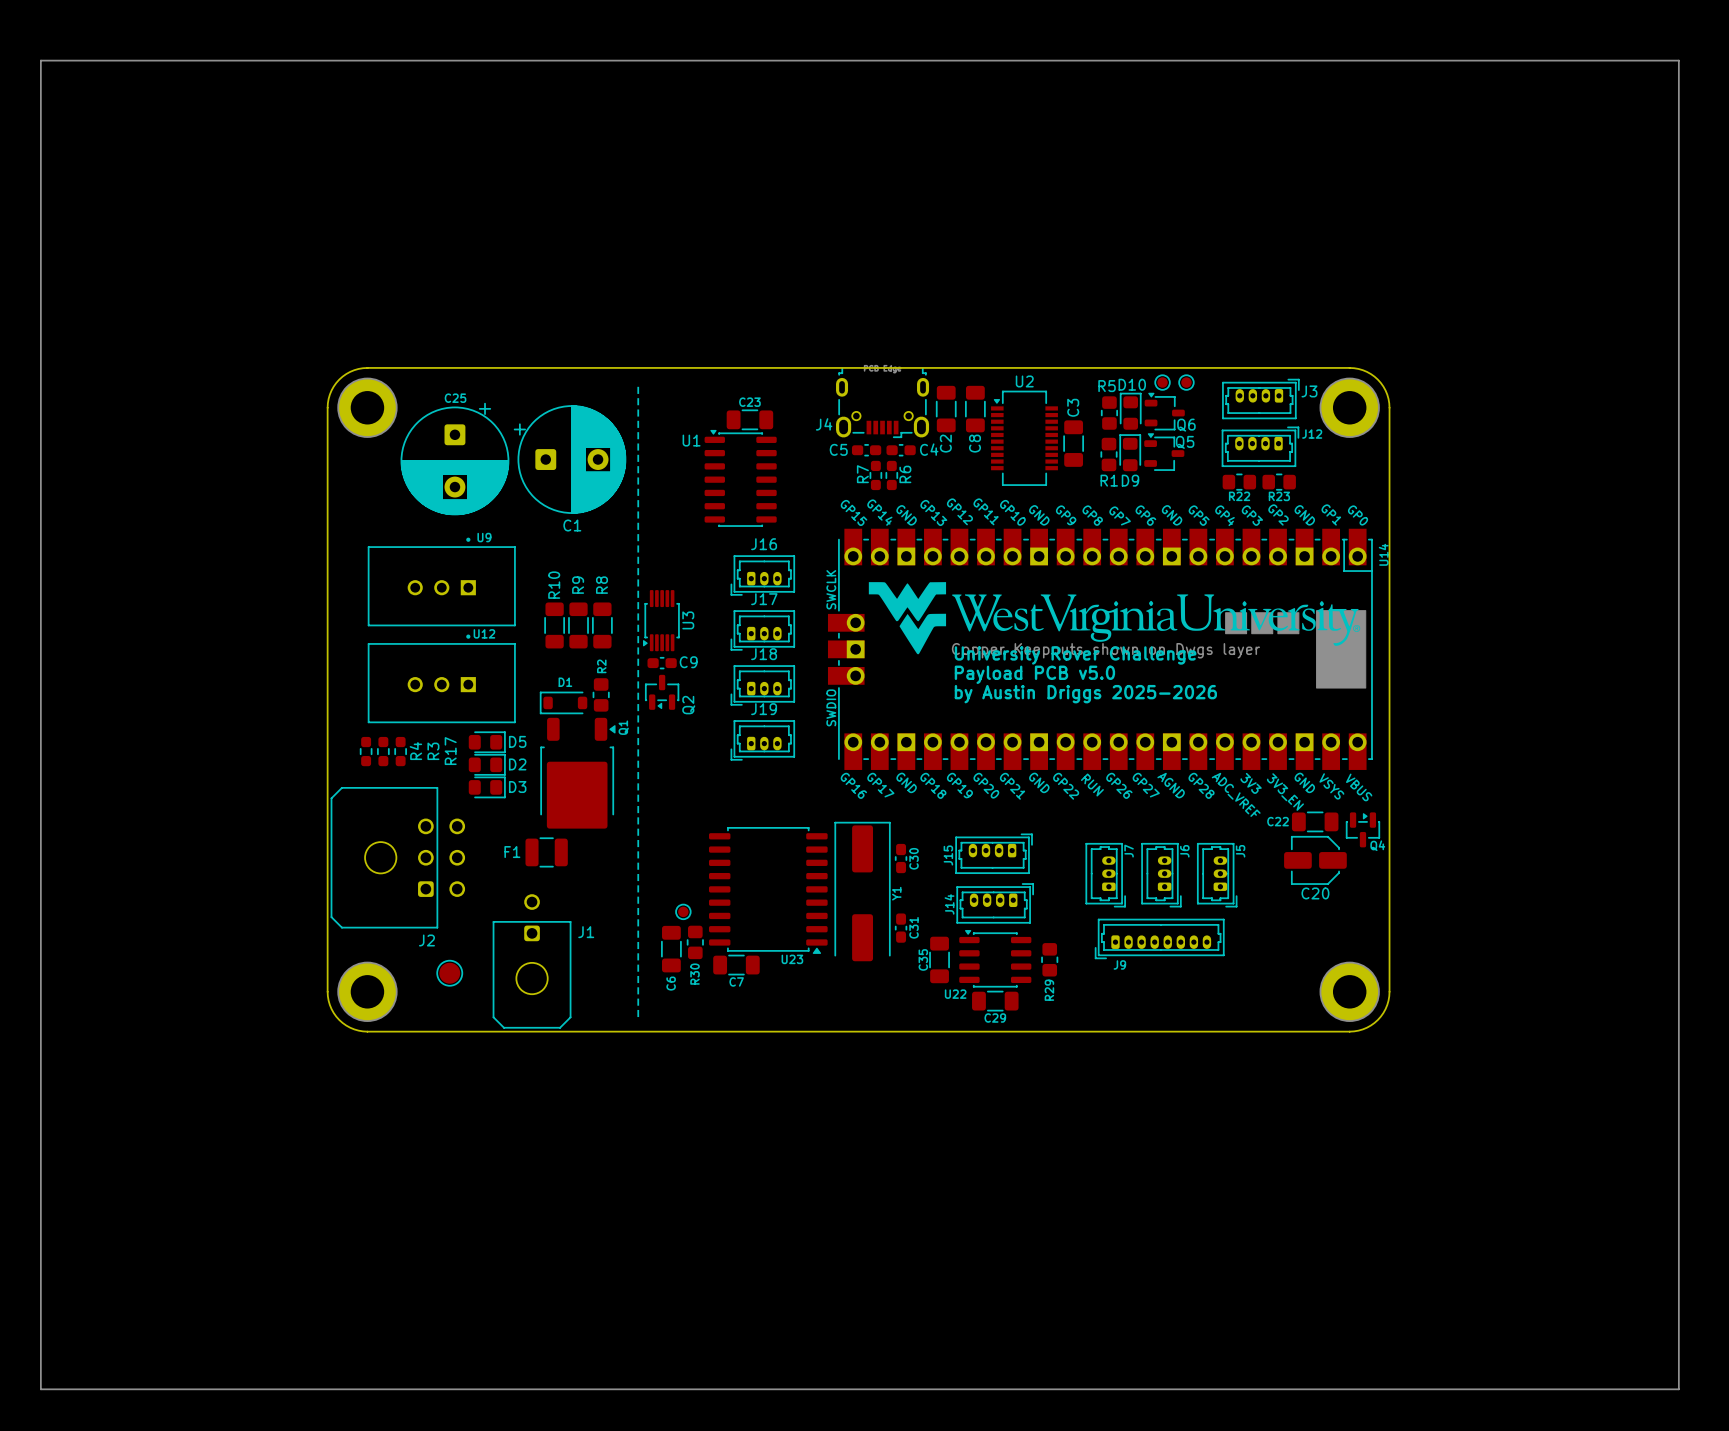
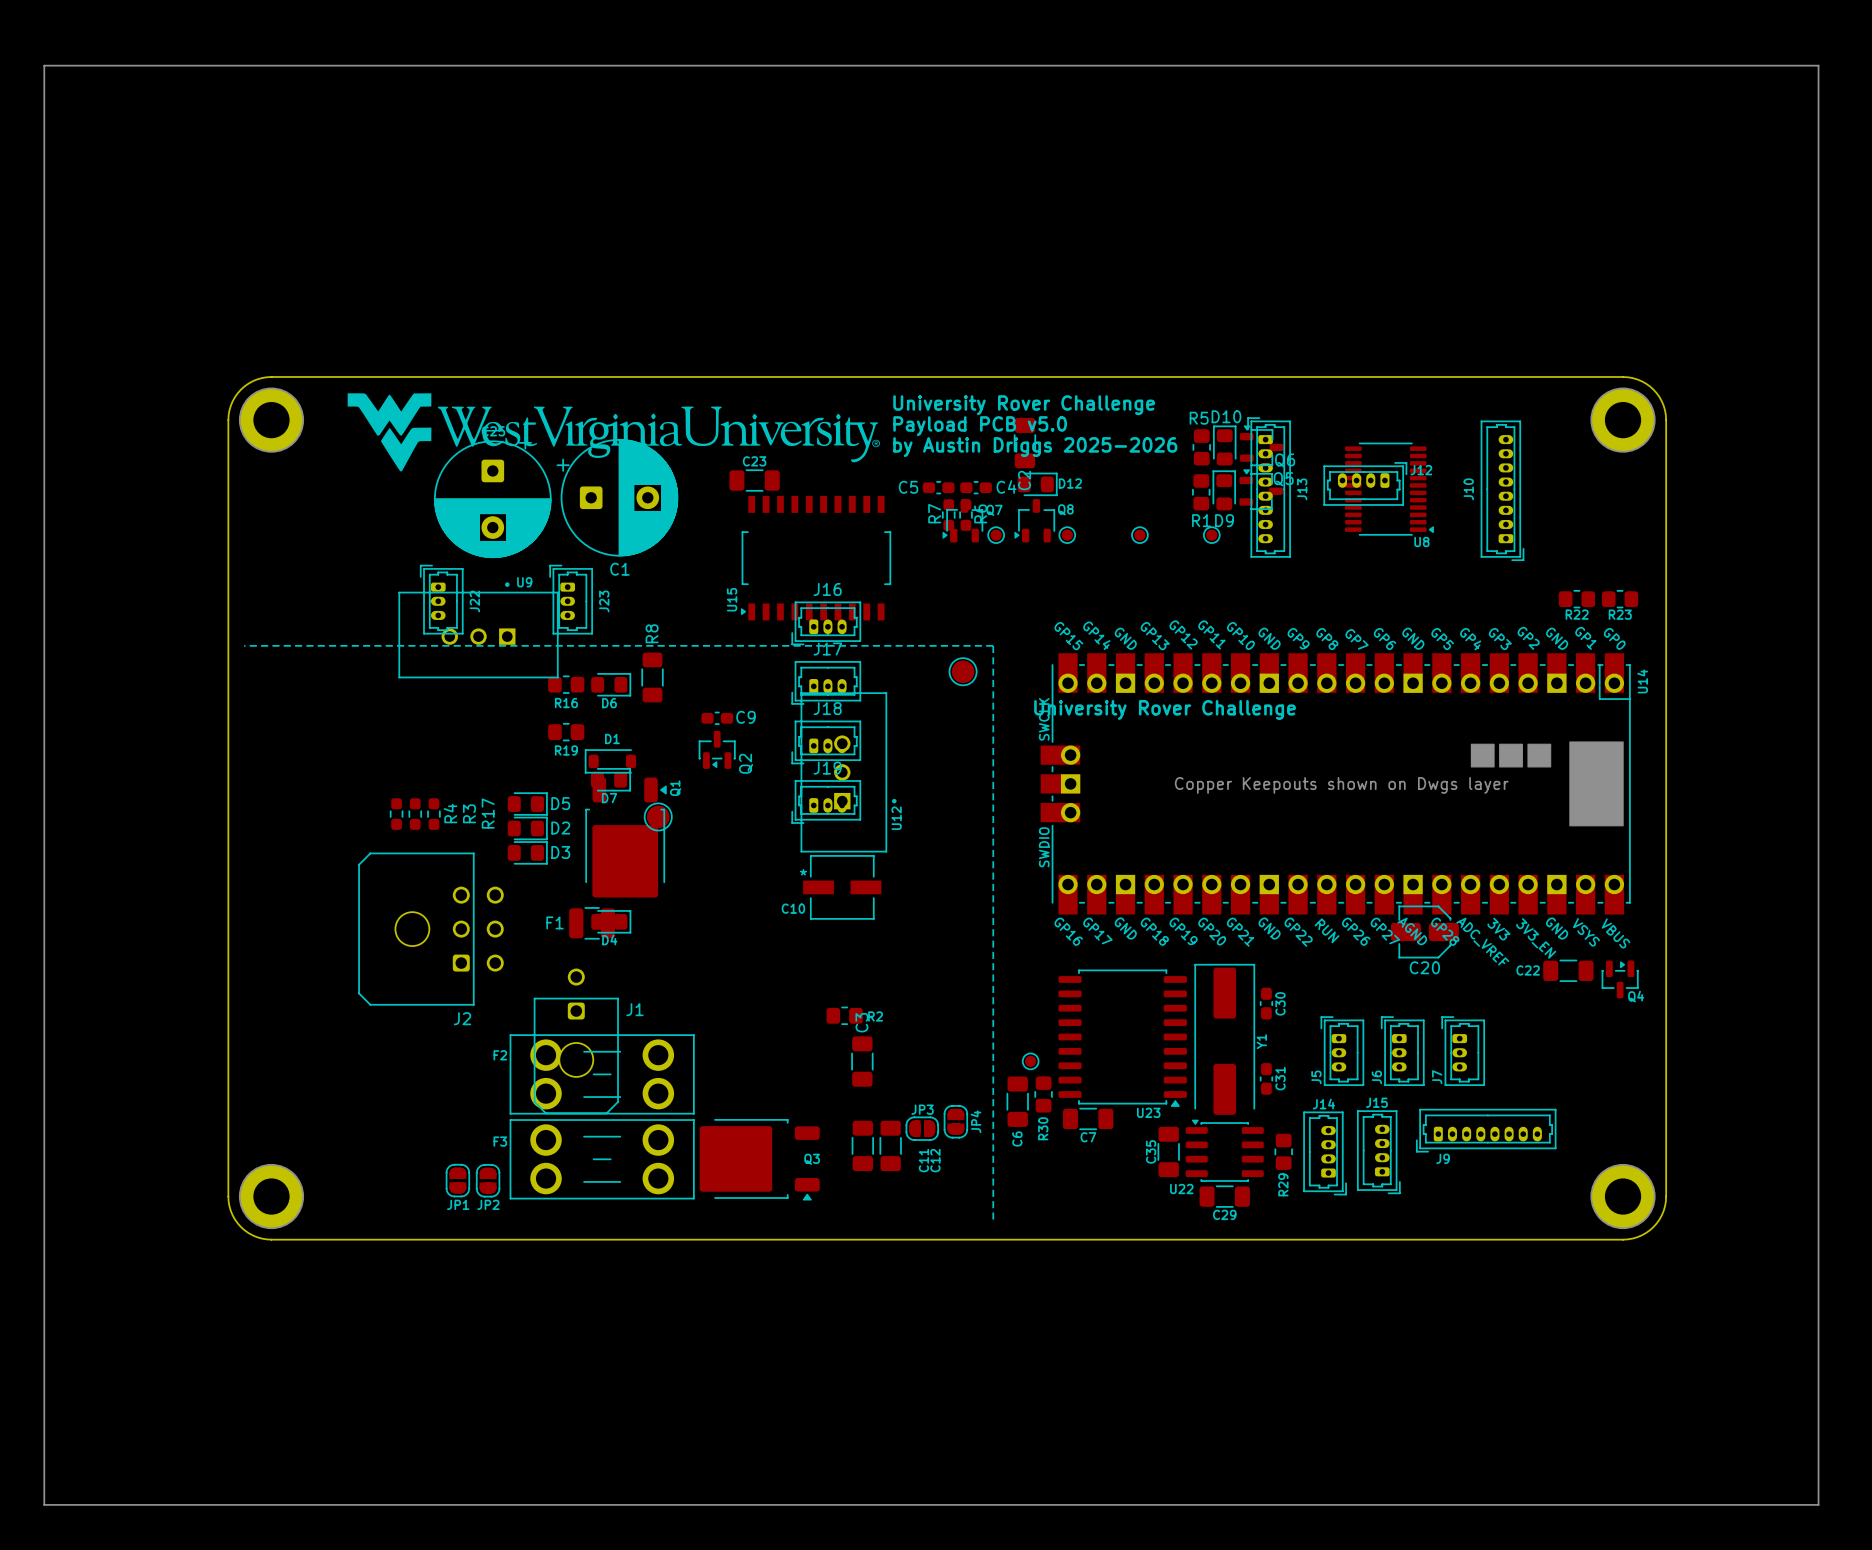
drawing: none -> [347, 393, 880, 472]
board edge: (367, 367) (1349, 367) (1370, 374) (1383, 386) (1389, 407) (1389, 991) (1383, 1013) (1366, 1027) (1349, 1031) (367, 1031) (346, 1025) (333, 1013) (327, 991) (327, 407) (331, 390) (339, 379) (354, 370) (367, 367) -> (271, 376) (257, 379) (240, 389) (232, 401) (228, 420) (228, 1196) (232, 1215) (237, 1223) (248, 1233) (261, 1238) (271, 1239) (1623, 1239) (1637, 1237) (1645, 1233) (1659, 1219) (1663, 1210) (1666, 1196) (1666, 420) (1661, 401) (1656, 393) (1645, 383) (1632, 378) (1623, 376) (271, 376)
text: none -> University Rover Challenge (1024, 405)
part: (1162, 382) -> none
part: (1186, 382) -> none
line: (638, 385) (638, 1017) -> none
text: none -> Payload PCB v5.0 (980, 426)
J3: (1260, 399) -> none
J4: (882, 402) -> none
part position: (367, 407) -> (271, 420)
part position: (1349, 407) -> (1623, 420)
C8: (975, 409) -> none
text: none -> by Austin Driggs 2025-2026 (1035, 447)
C23 position: (749, 419) -> (754, 480)
U2: (1024, 438) -> none
C3 position: (1073, 443) -> (862, 1061)
D12: none -> (1037, 484)
J13: none -> (1269, 487)
U8: none -> (1389, 489)
J10: none -> (1502, 490)
U1: (740, 478) -> none
Q7: none -> (962, 520)
Q8: none -> (1034, 520)
R22 position: (1239, 482) -> (1576, 599)
R23 position: (1279, 482) -> (1620, 599)
part: none -> (996, 535)
part: none -> (1067, 535)
part: none -> (1139, 535)
part: none -> (1211, 535)
U15: none -> (815, 558)
J22: none -> (441, 599)
J23: none -> (571, 599)
drawing: [868, 582, 1361, 655] -> none
line: none -> (244, 645) (993, 645) (993, 1219)
U3: (661, 620) -> none
part: none -> (963, 671)
R10: (554, 625) -> none
R9: (578, 625) -> none
R16: none -> (566, 684)
D6: none -> (611, 684)
U14 position: (1100, 649) -> (1335, 783)
text: Payload PCB v5.0 (1034, 674) -> none
R19: none -> (566, 732)
U12 rotation: 0° (441, 678) -> 90° clockwise (848, 772)
U12 position: (441, 678) -> (848, 772)
R2 rotation: 0° (601, 694) -> 90° clockwise (844, 1015)
R2 position: (601, 694) -> (844, 1015)
text: by Austin Driggs 2025-2026 (1085, 694) -> none
D7: none -> (610, 779)
part: none -> (658, 816)
C10: none -> (842, 887)
C22 position: (1315, 821) -> (1568, 970)
Q4 position: (1362, 829) -> (1620, 979)
D4: none -> (611, 921)
J15 rotation: 0° (994, 853) -> 90° clockwise (1378, 1152)
J15 position: (994, 853) -> (1378, 1152)
C30 position: (901, 858) -> (1266, 1003)
J7 rotation: 0° (1105, 875) -> 180° (1463, 1051)
J7 position: (1105, 875) -> (1463, 1051)
J6 rotation: 0° (1161, 875) -> 180° (1402, 1051)
J6 position: (1161, 875) -> (1402, 1051)
J5 rotation: 0° (1217, 875) -> 180° (1342, 1051)
J5 position: (1217, 875) -> (1342, 1051)
U23 position: (768, 890) -> (1122, 1038)
Y1 position: (862, 891) -> (1224, 1039)
J14 rotation: 0° (995, 903) -> 90° clockwise (1325, 1153)
J14 position: (995, 903) -> (1325, 1153)
part: (683, 911) -> none
C31 position: (901, 928) -> (1266, 1078)
J9 position: (1159, 938) -> (1486, 1130)
R30 position: (695, 942) -> (1043, 1094)
C6 position: (671, 949) -> (1017, 1101)
U22 position: (995, 958) -> (1224, 1150)
C35 position: (939, 959) -> (1168, 1151)
R29 position: (1049, 959) -> (1283, 1151)
C7 position: (736, 965) -> (1088, 1118)
part: (449, 973) -> none
part: none -> (1030, 1061)
part position: (367, 991) -> (271, 1196)
F2: none -> (602, 1074)
part position: (1349, 991) -> (1623, 1196)
C29 position: (995, 1001) -> (1224, 1196)
JP4: none -> (955, 1121)
JP3: none -> (922, 1128)
C11: none -> (862, 1145)
C12: none -> (890, 1145)
F3: none -> (602, 1159)
Q3: none -> (759, 1159)
JP1: none -> (457, 1180)
JP2: none -> (488, 1180)

